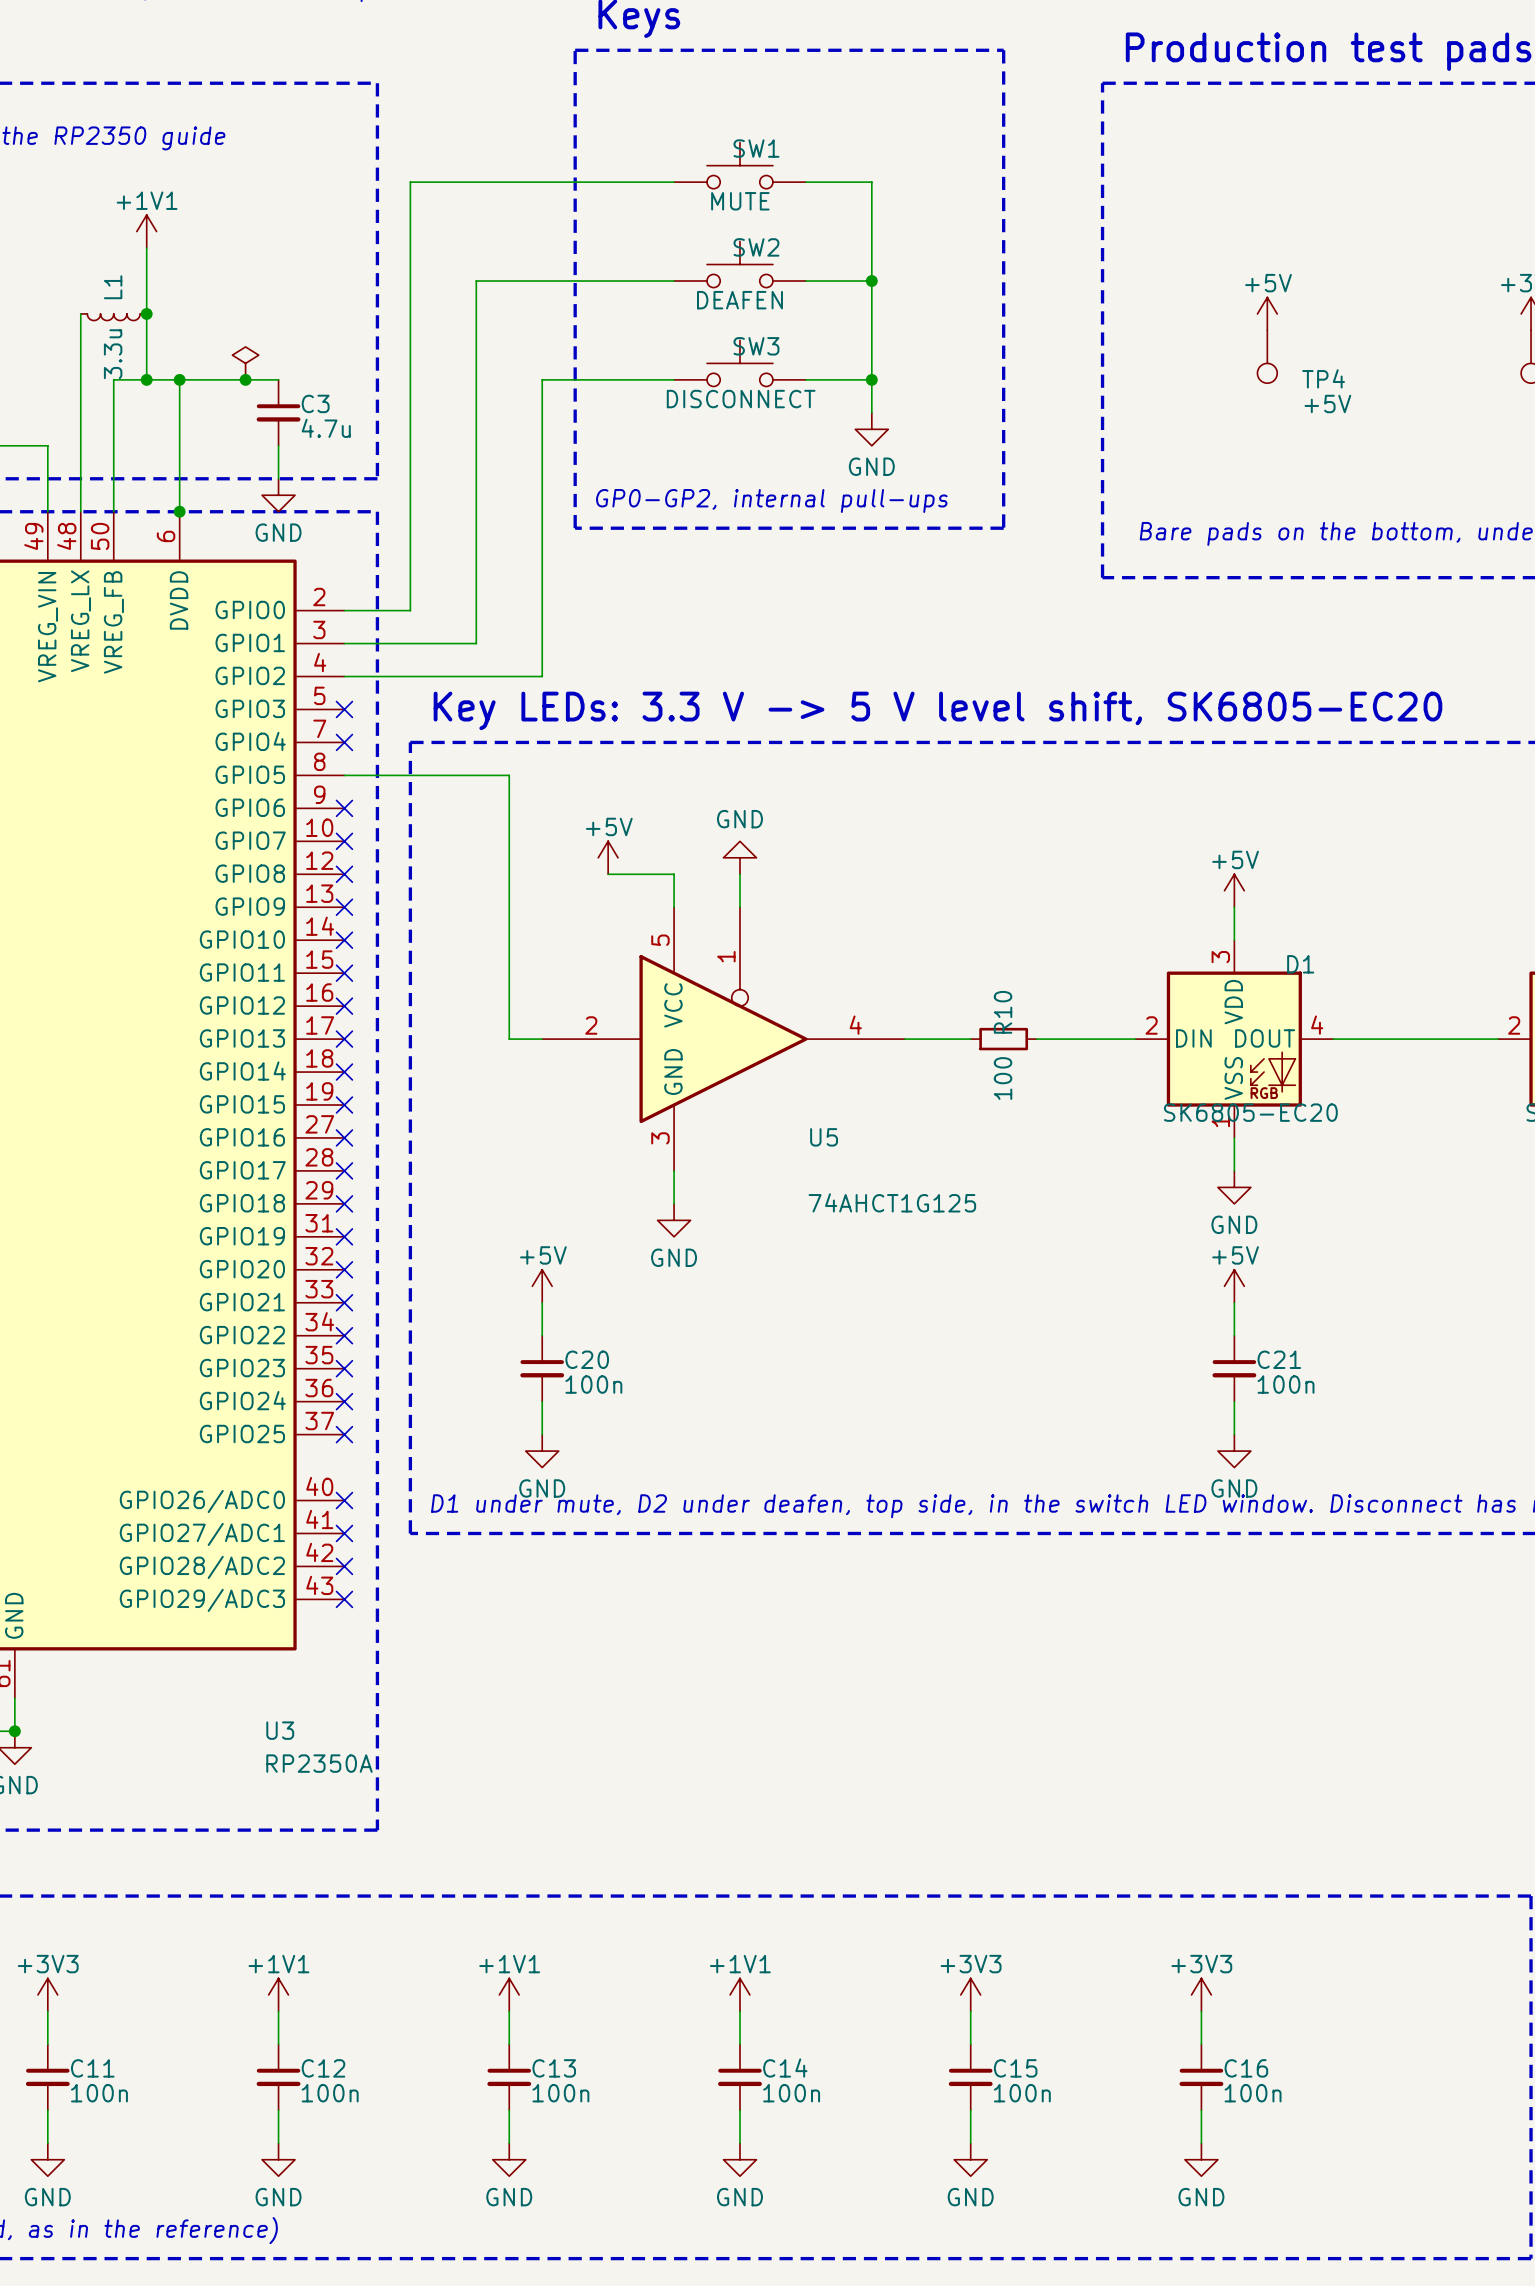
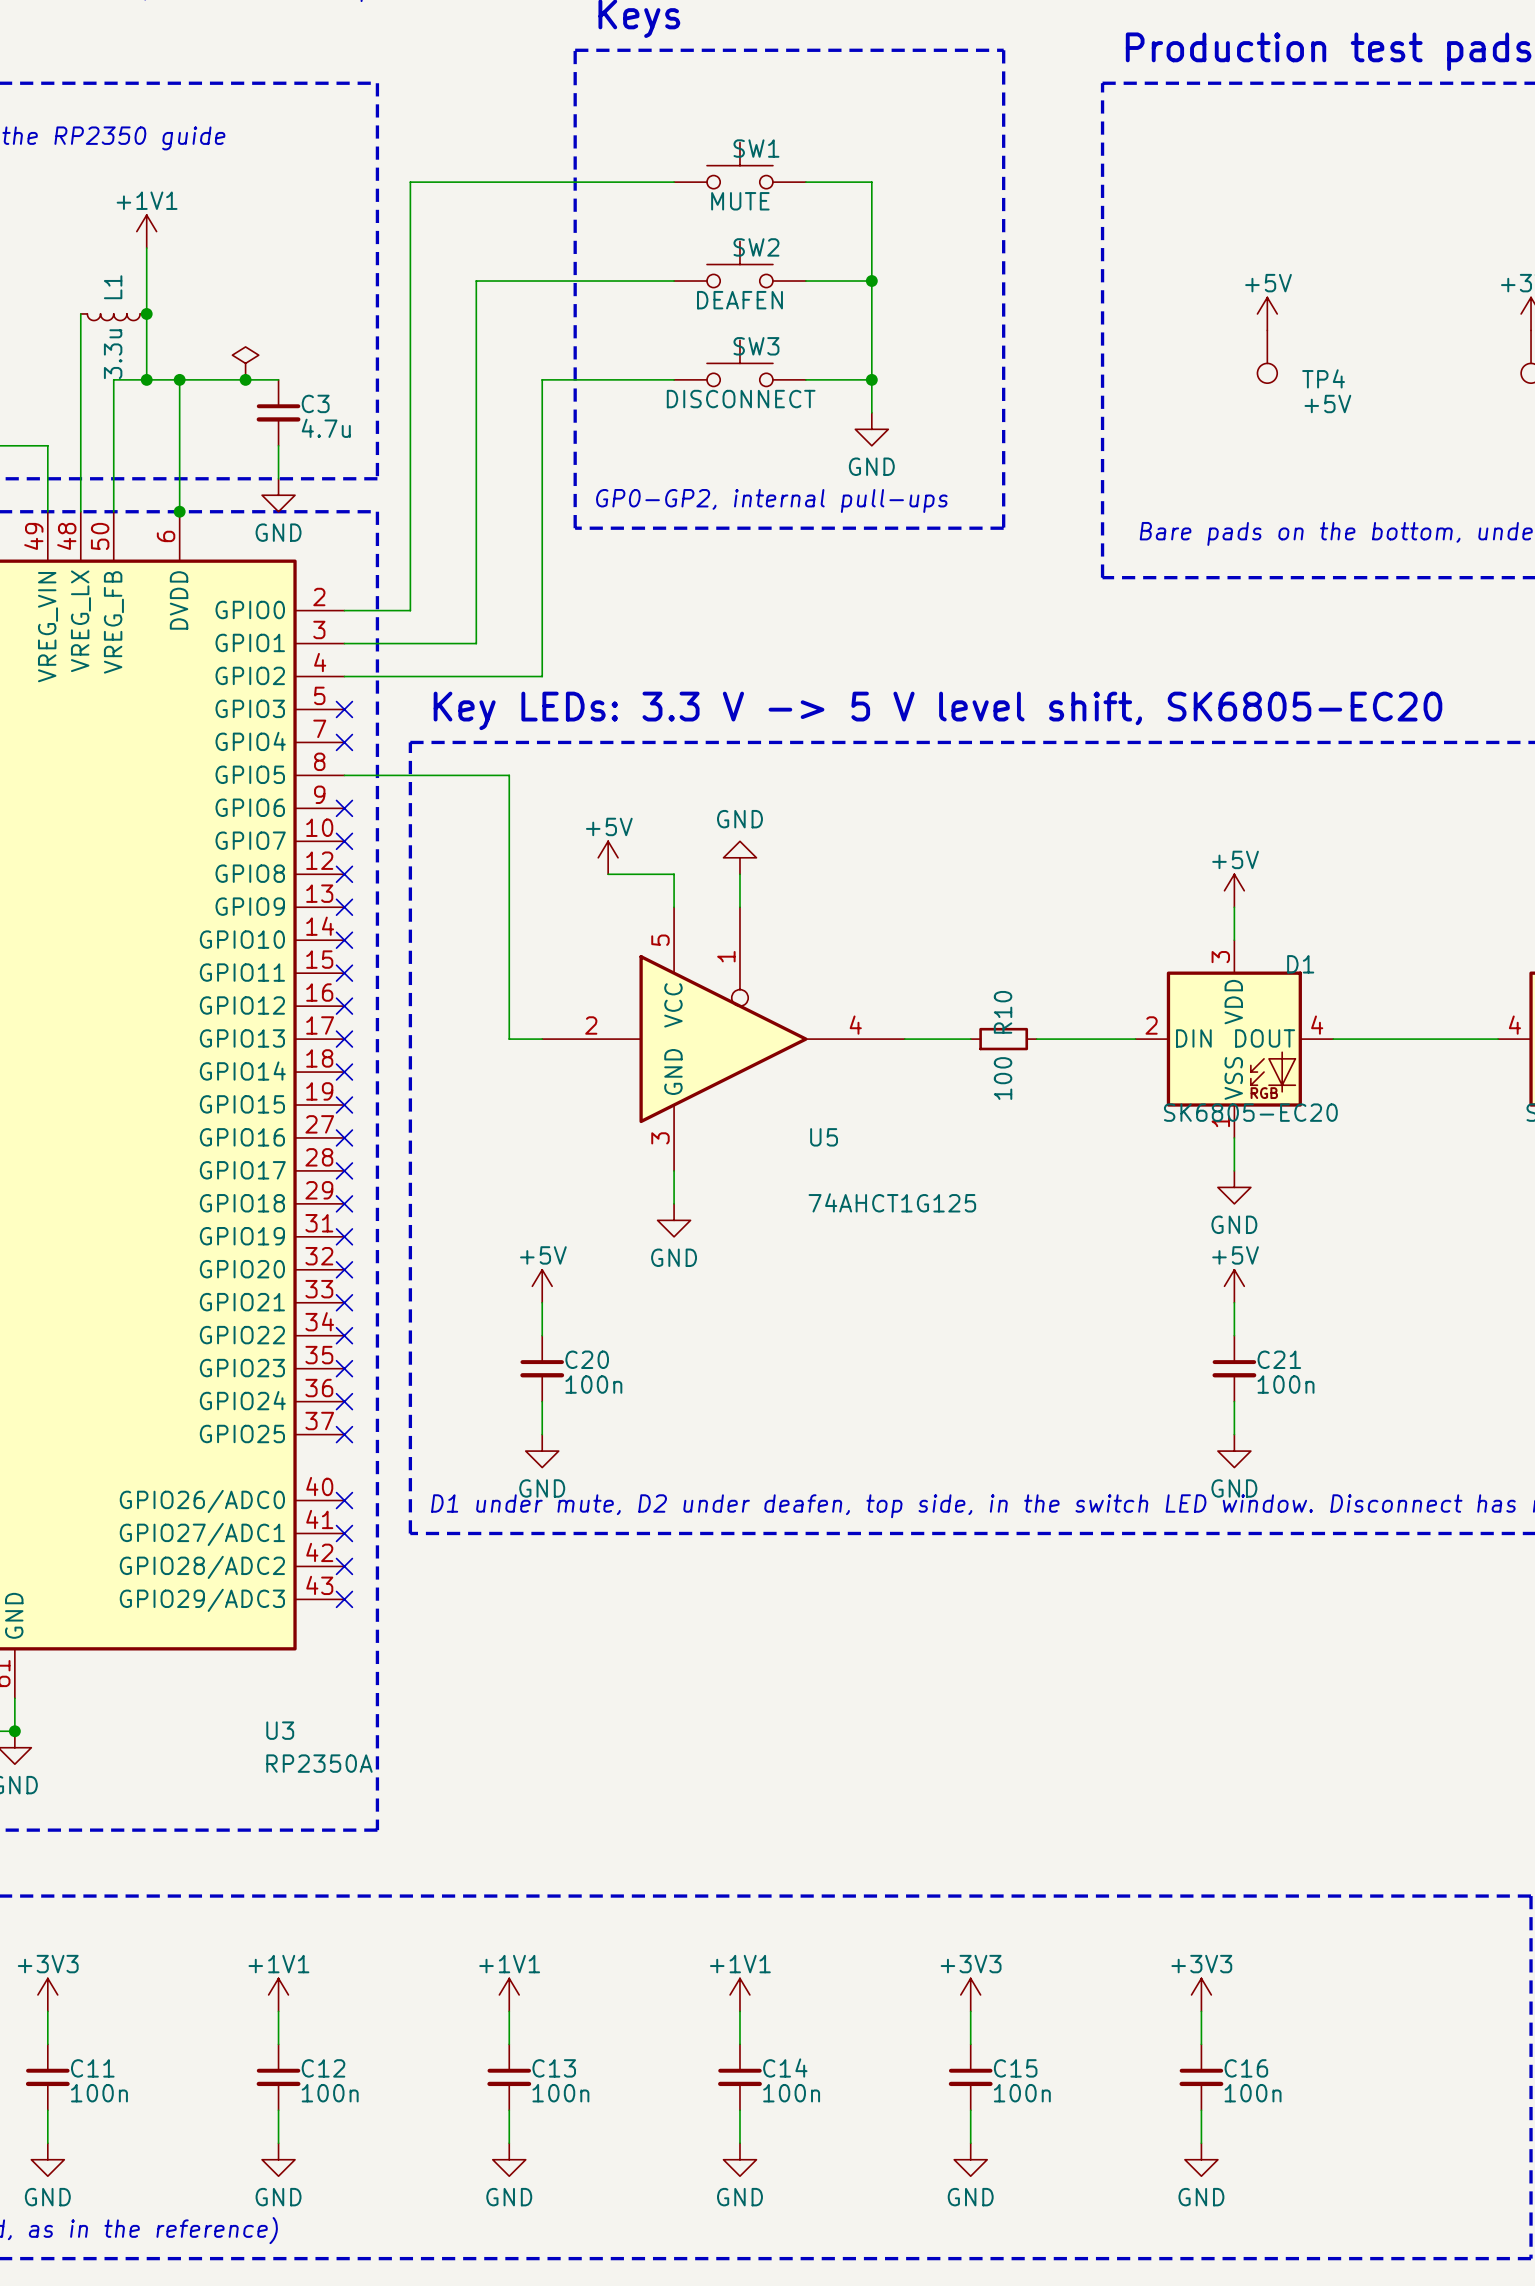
part pin number: 2 (1514, 1025) -> 4 (1514, 1025)

